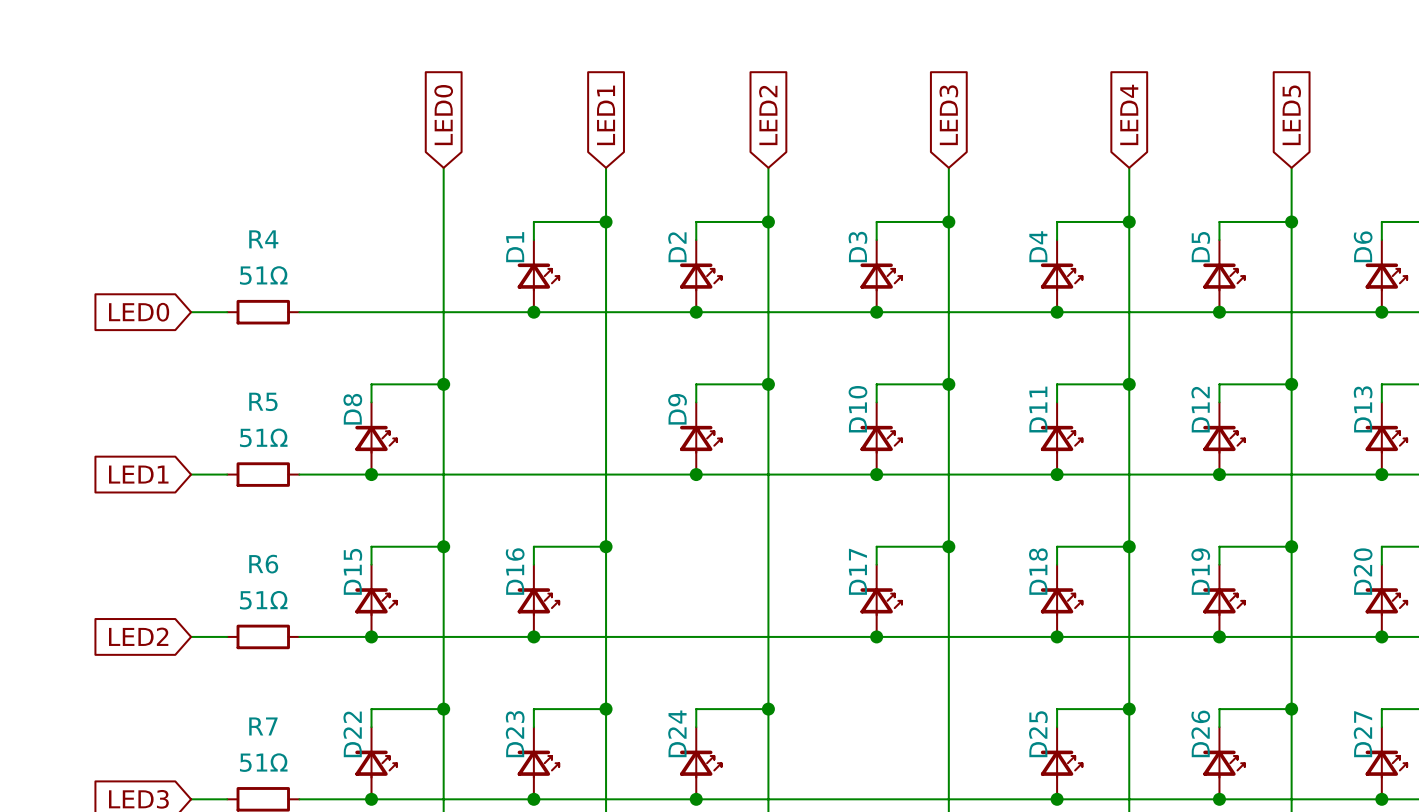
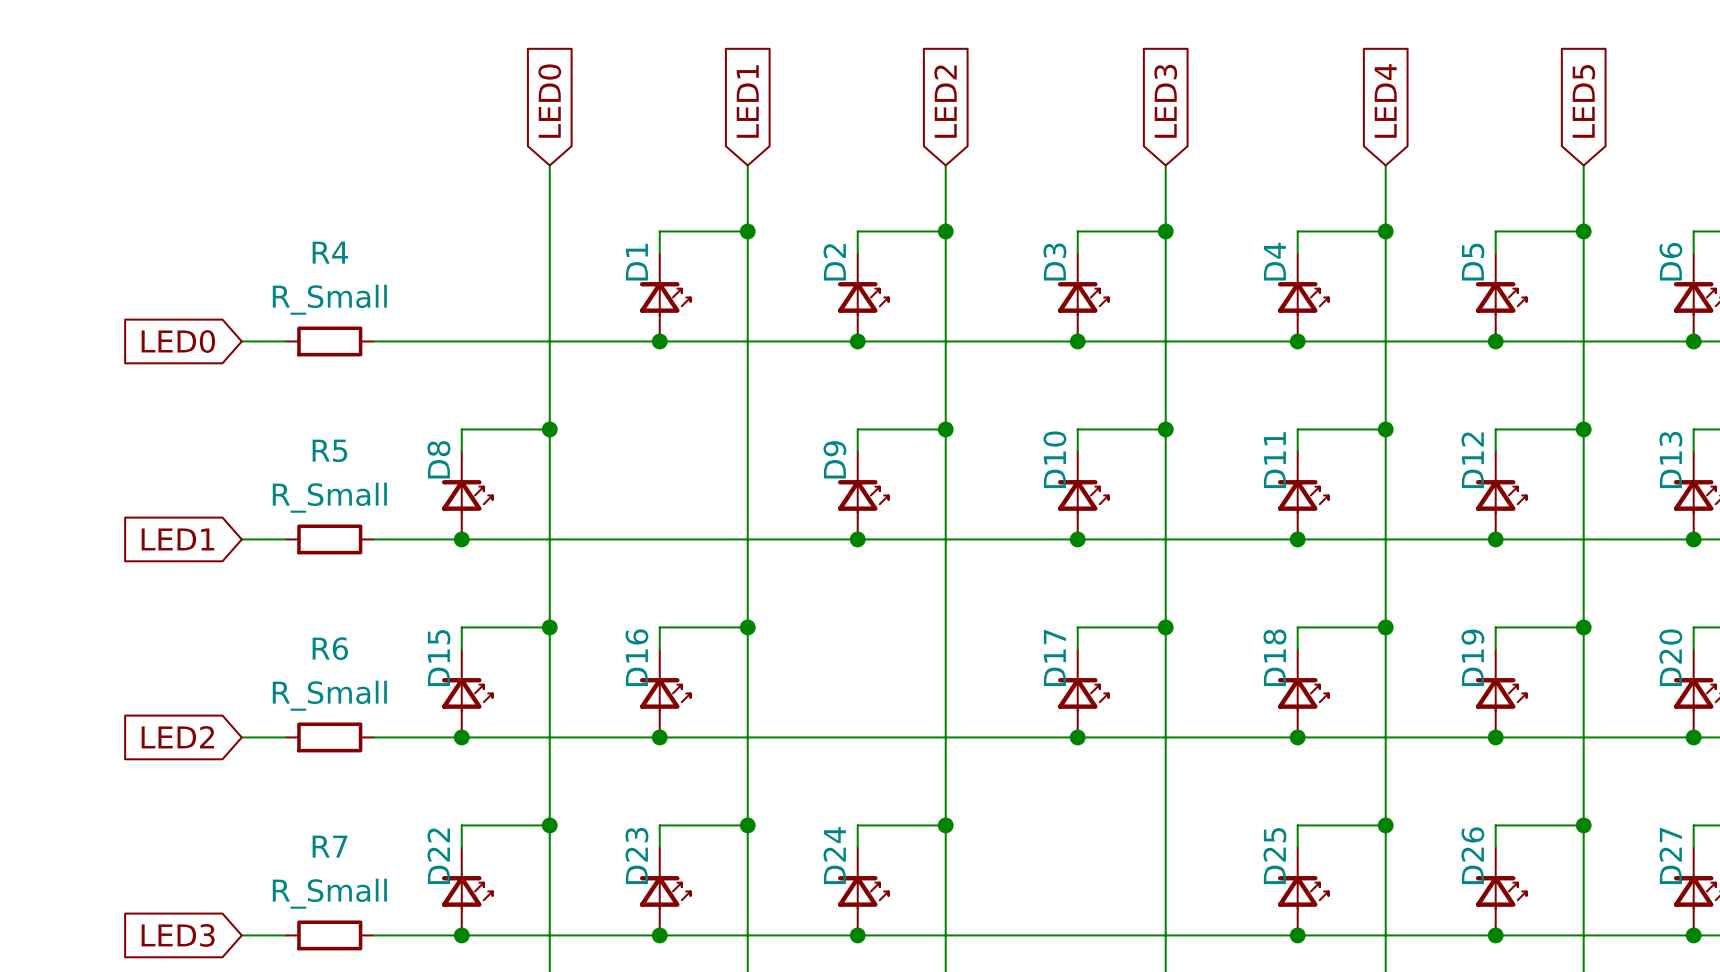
R4 value: 51Ω (263, 275) -> R_Small (329, 299)
R5 value: 51Ω (263, 437) -> R_Small (329, 497)
R6 value: 51Ω (263, 600) -> R_Small (329, 695)
R7 value: 51Ω (263, 762) -> R_Small (329, 893)

